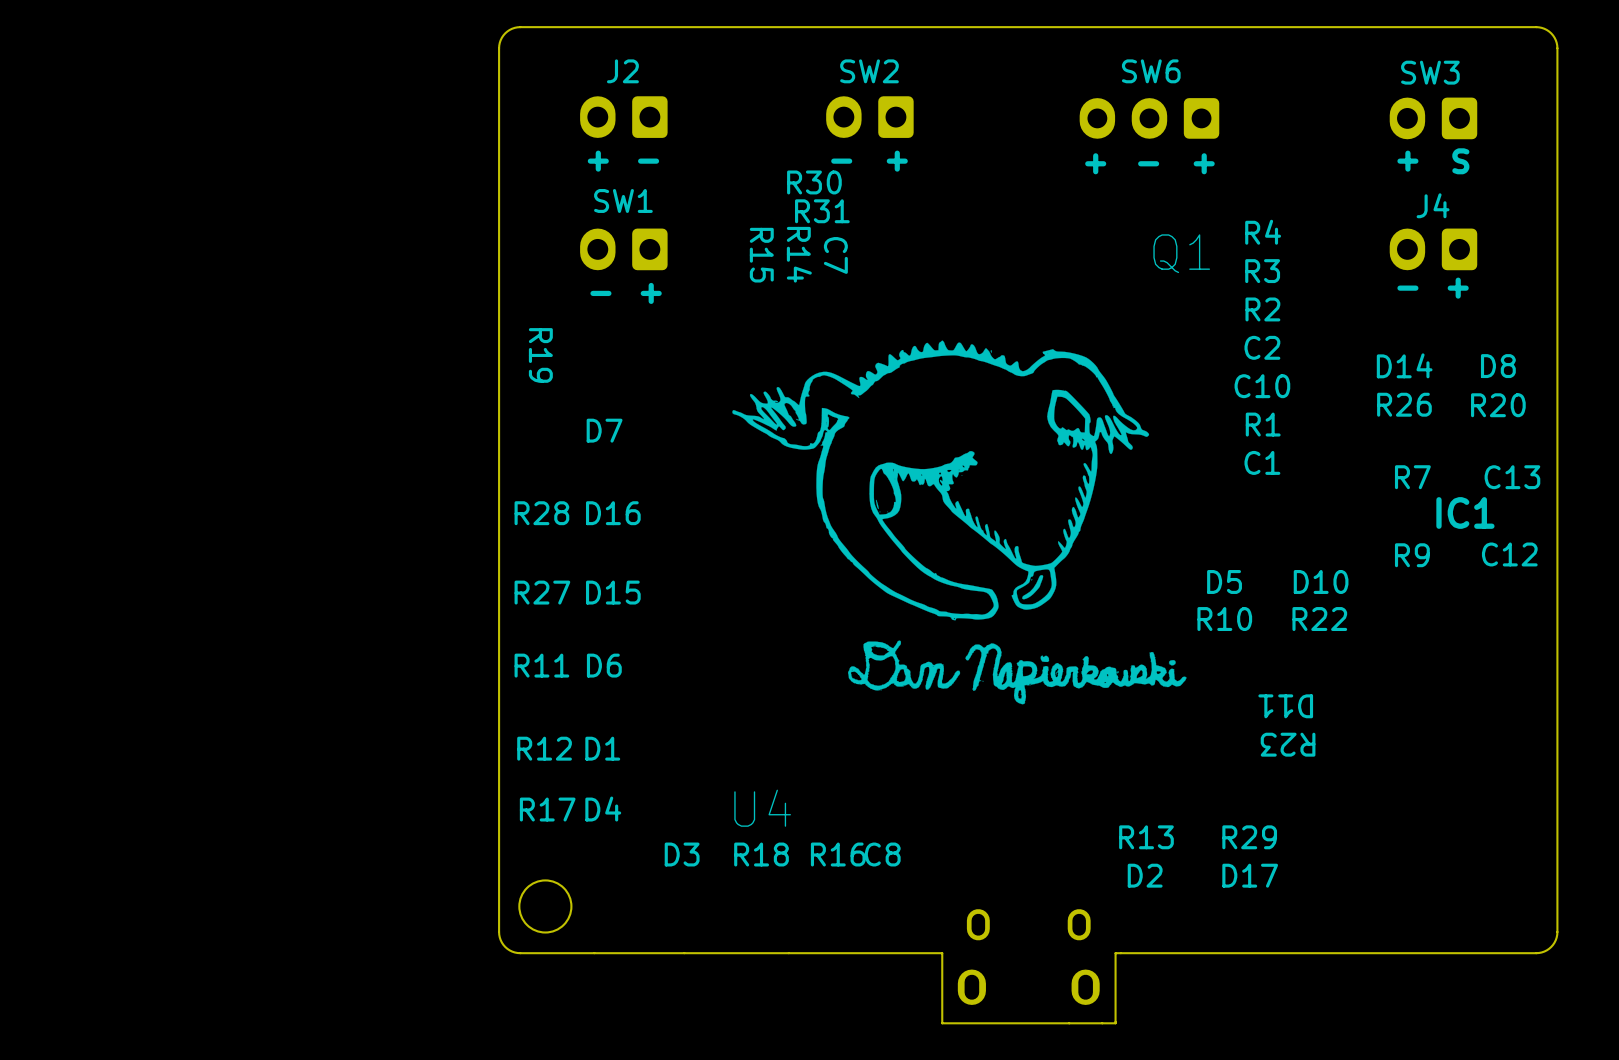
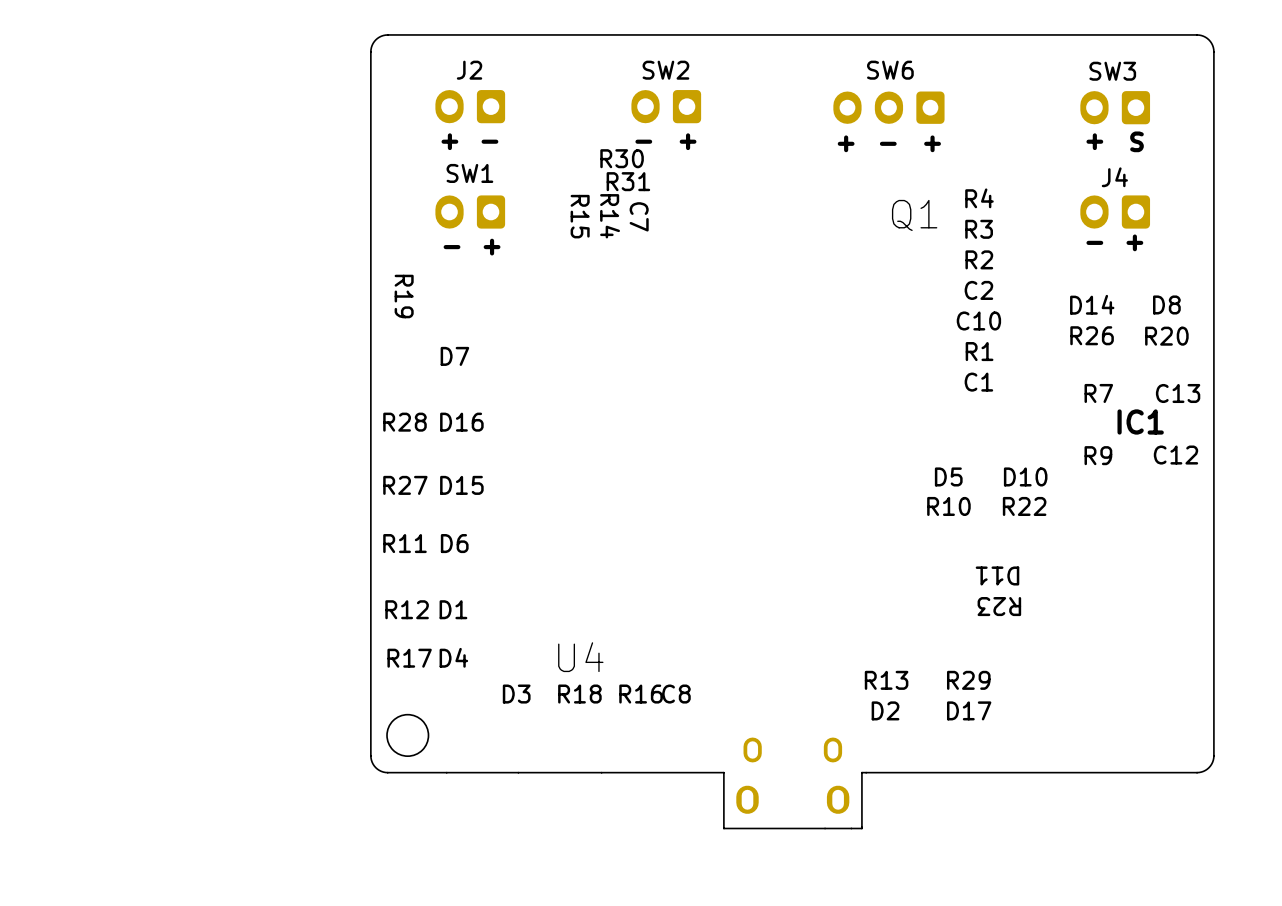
drawing: [732, 340, 1187, 705] -> none

